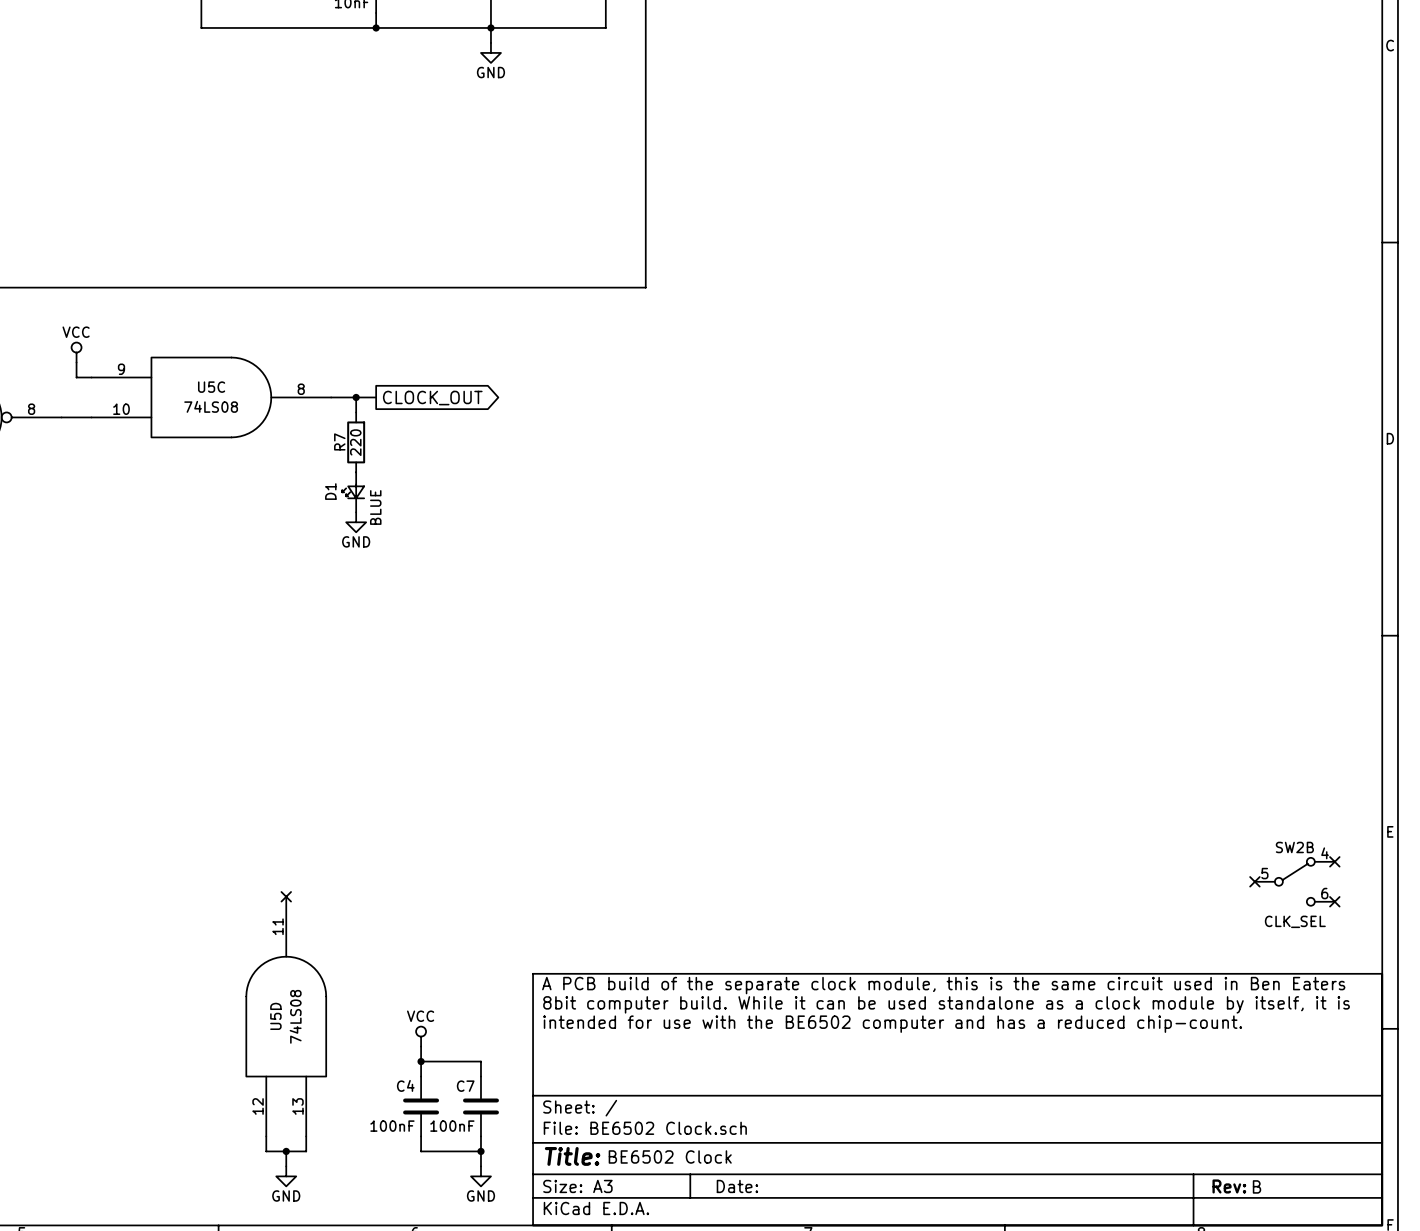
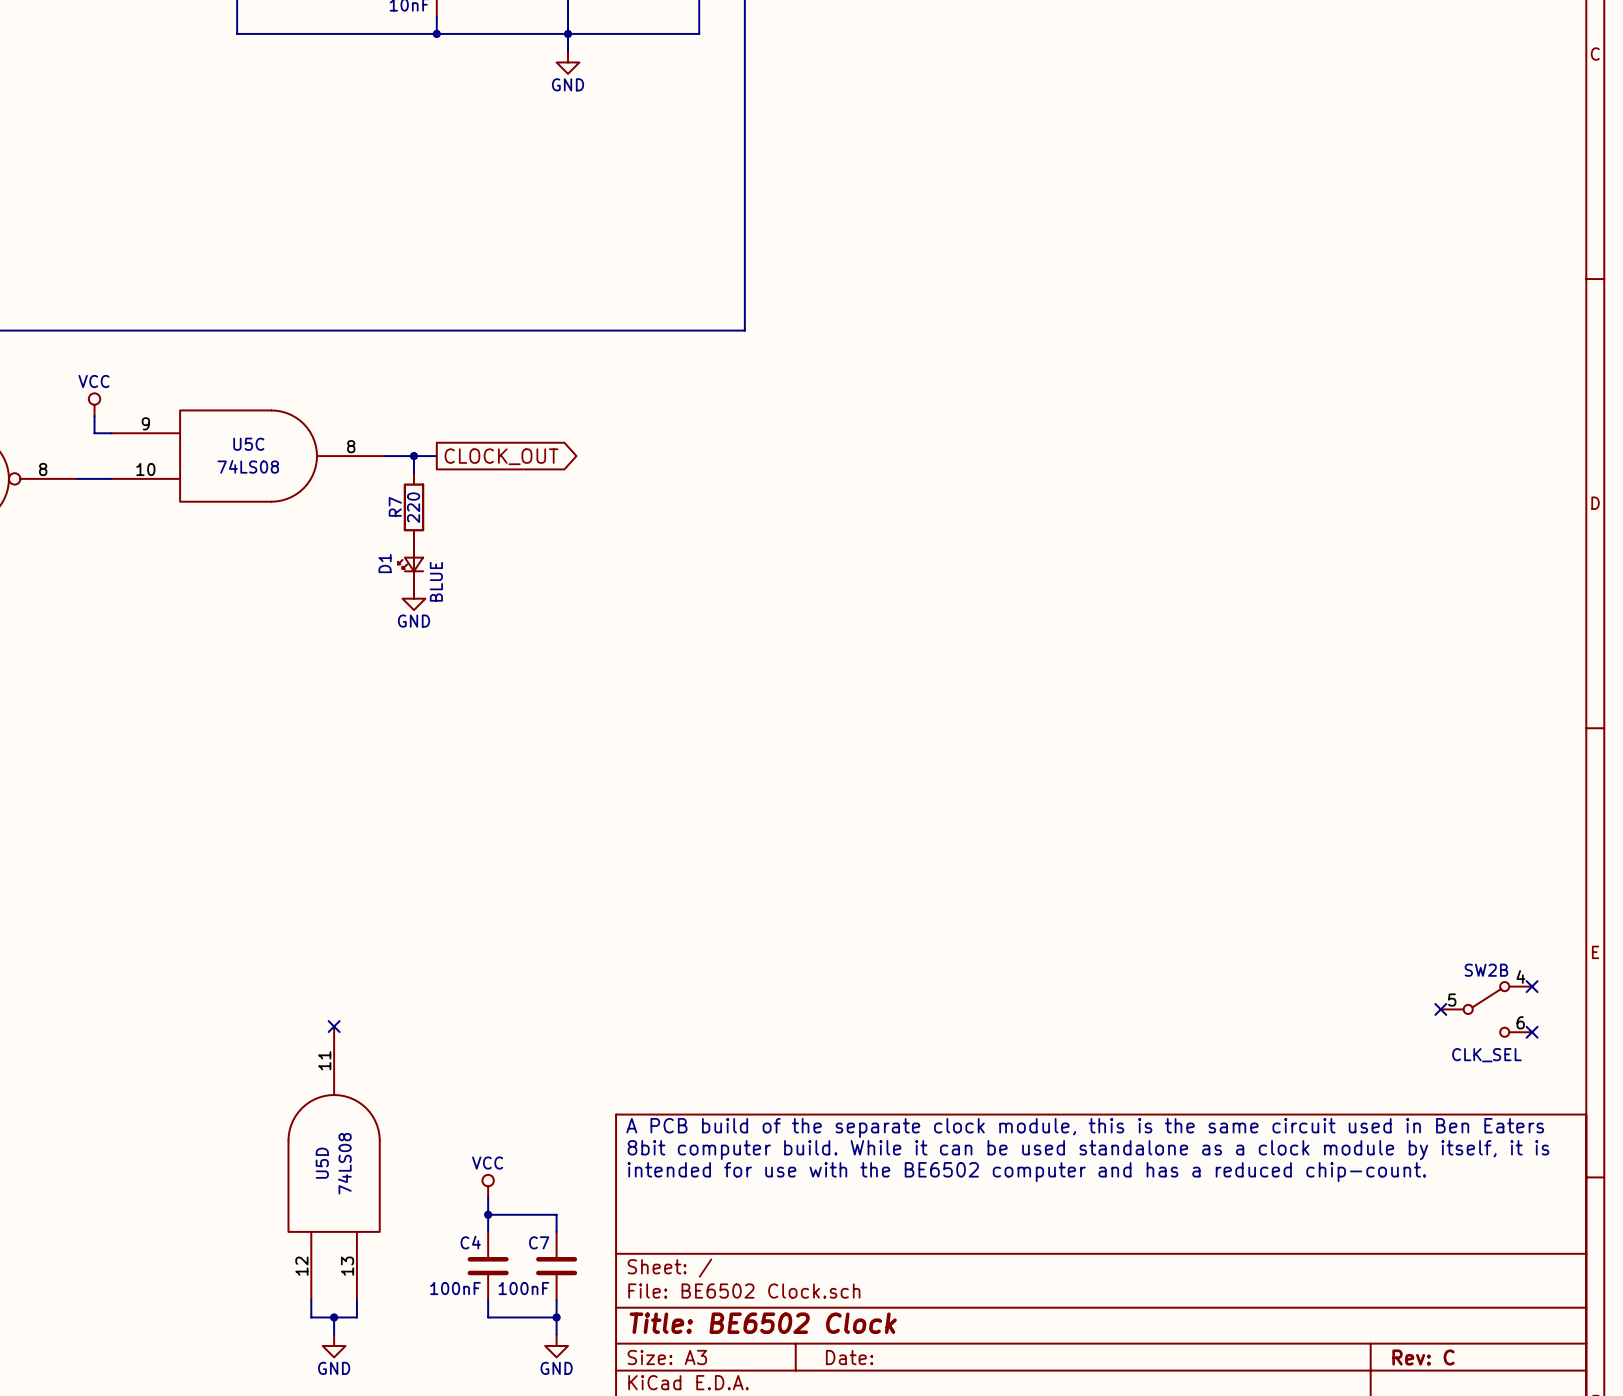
title block: Title: (572, 1156) -> Title: BE6502 Clock (763, 1323)
text: BE6502 Clock (670, 1156) -> none
title block: Rev: (1229, 1186) -> Rev: C (1423, 1357)
text: B (1256, 1186) -> none

